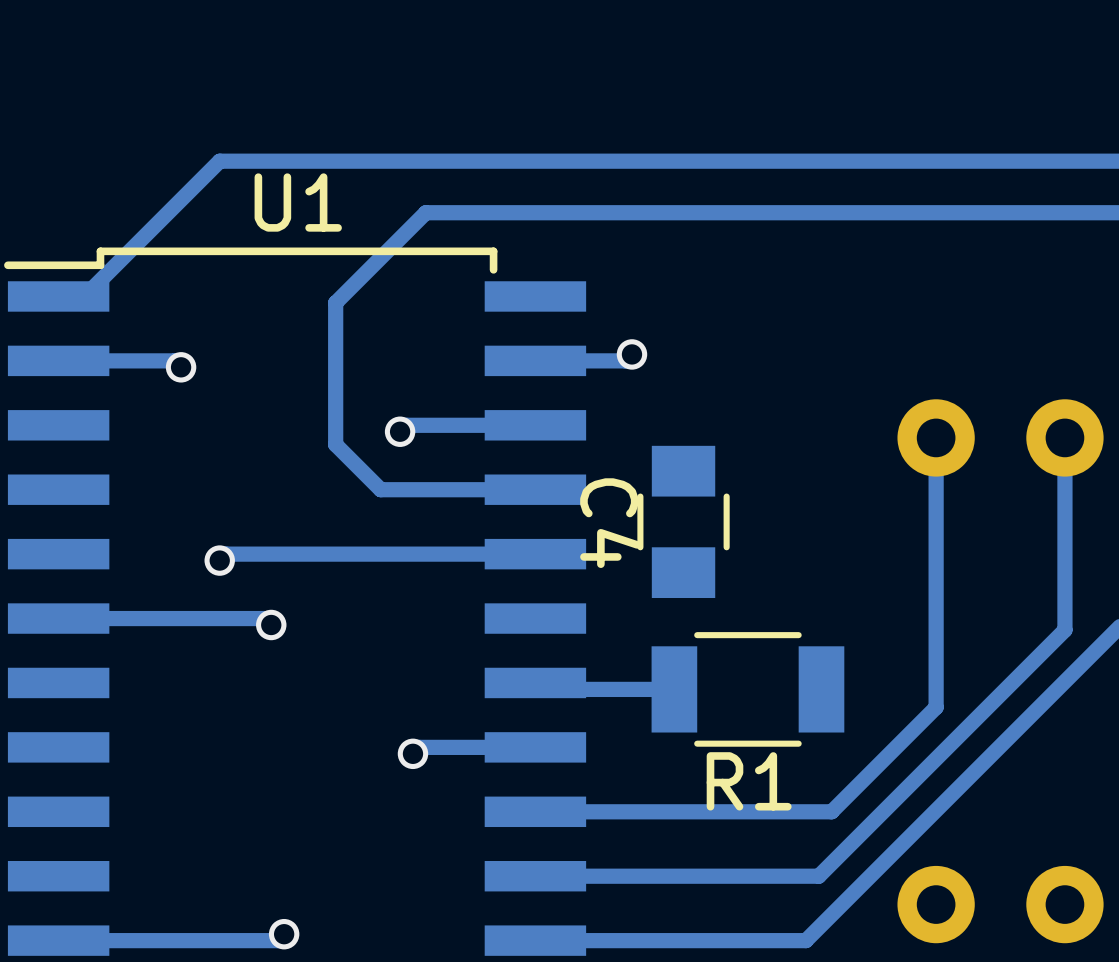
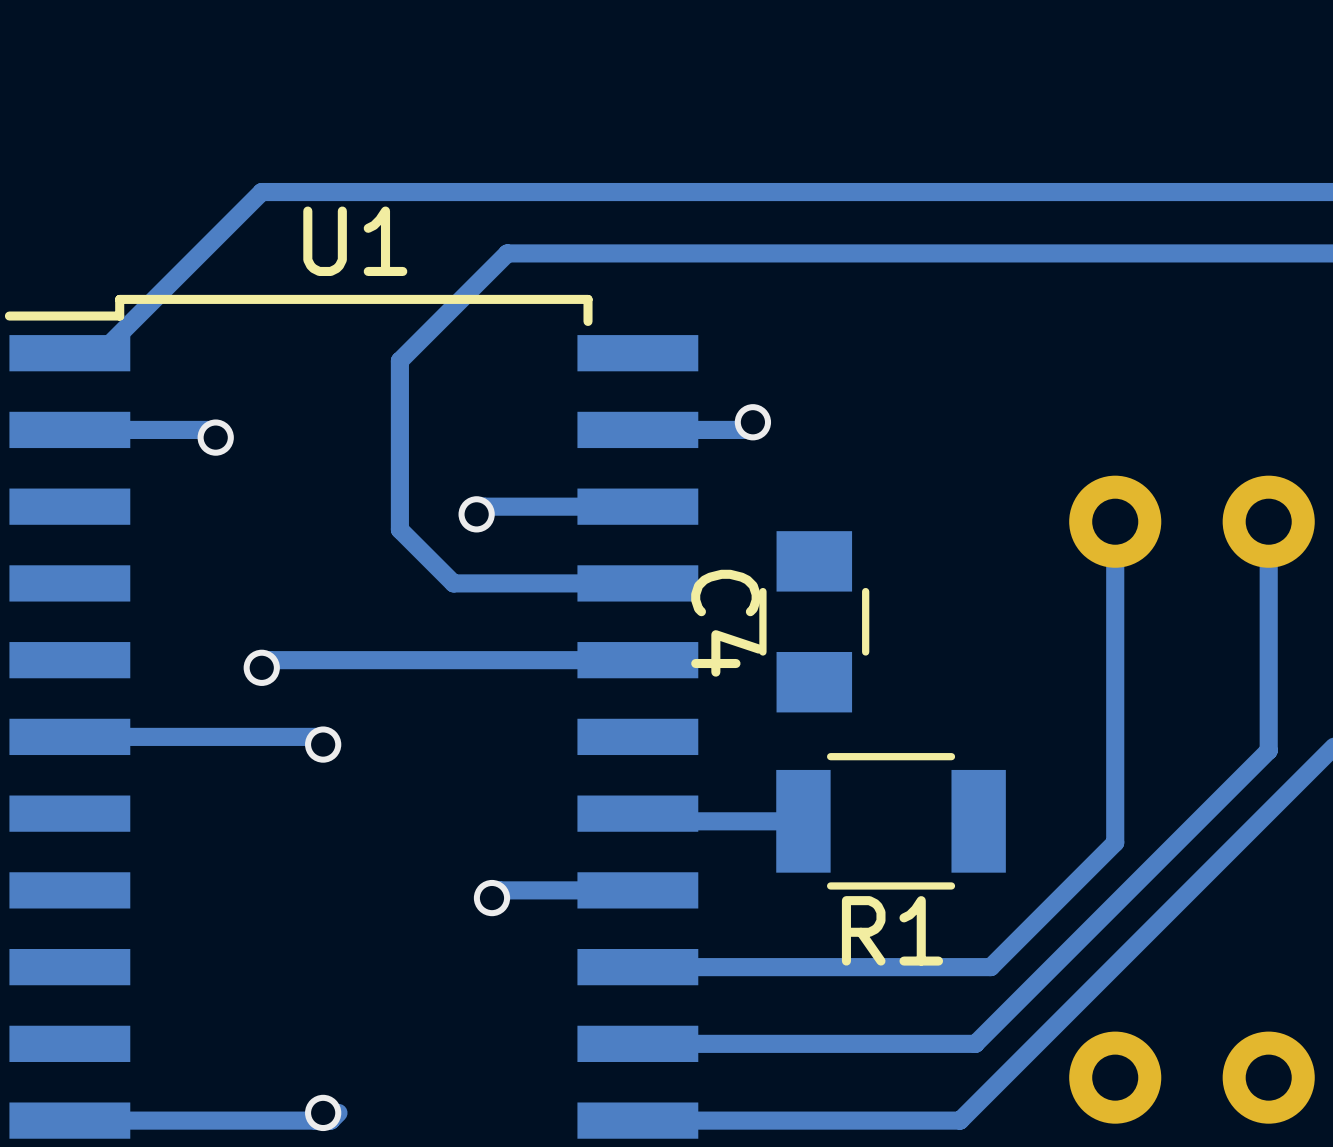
via position: (284, 934) -> (323, 1112)

